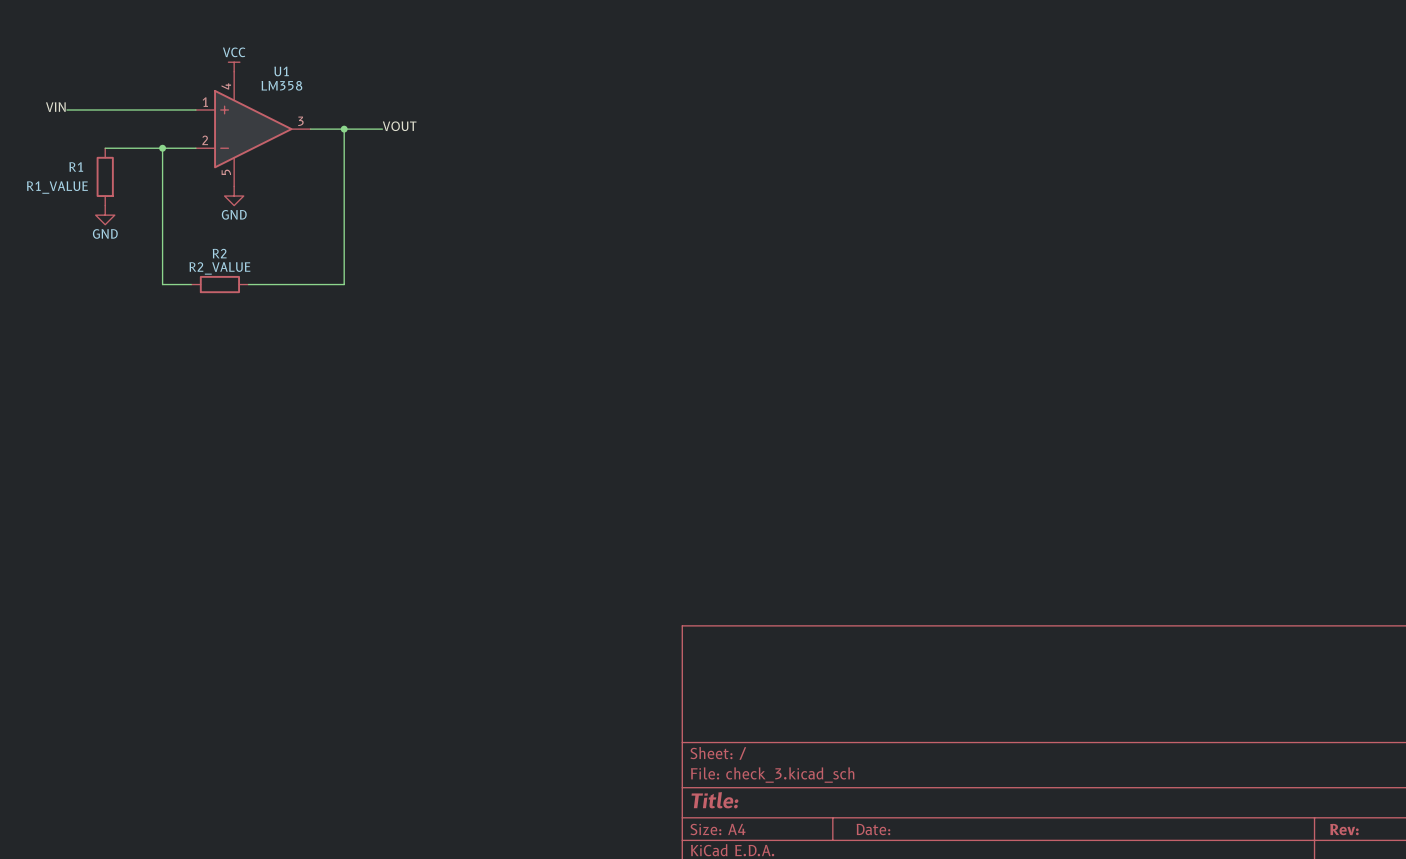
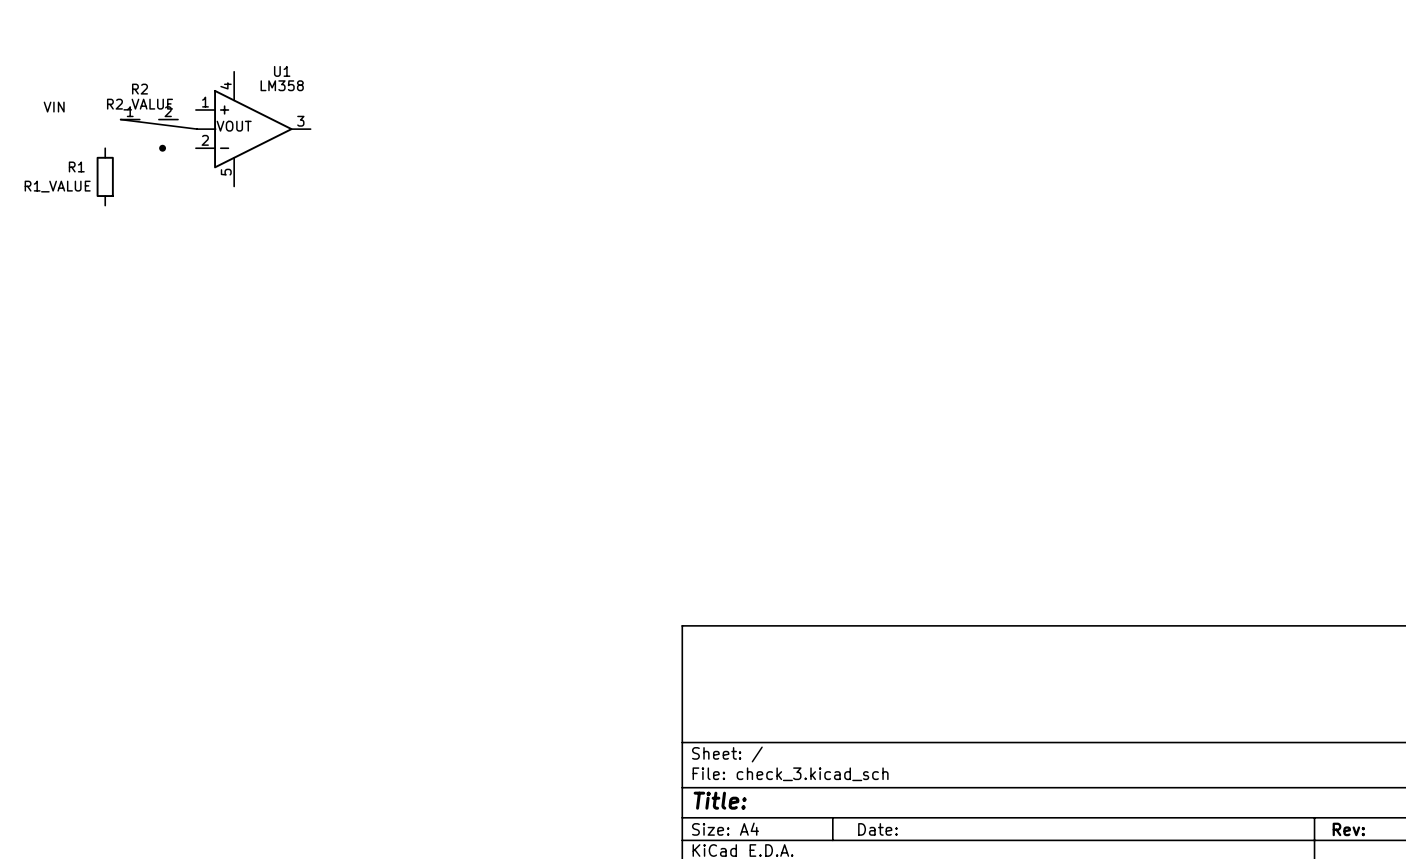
power symbol: VCC (234, 66) -> none
wire: (66, 110) (195, 110) -> none
wire: none -> (120, 119) (197, 129) (215, 129)
label position: VOUT (399, 126) -> VOUT (234, 126)
wire: (310, 129) (382, 129) -> none
wire: (344, 129) (344, 284) (248, 284) -> none
junction: (344, 129) -> none
wire: (105, 148) (195, 148) -> none
wire: (162, 148) (162, 284) (191, 284) -> none
power symbol: GND (234, 196) -> none
power symbol: GND (105, 215) -> none
R2 symbol: [191, 275, 249, 294] -> [120, 119, 179, 120]

